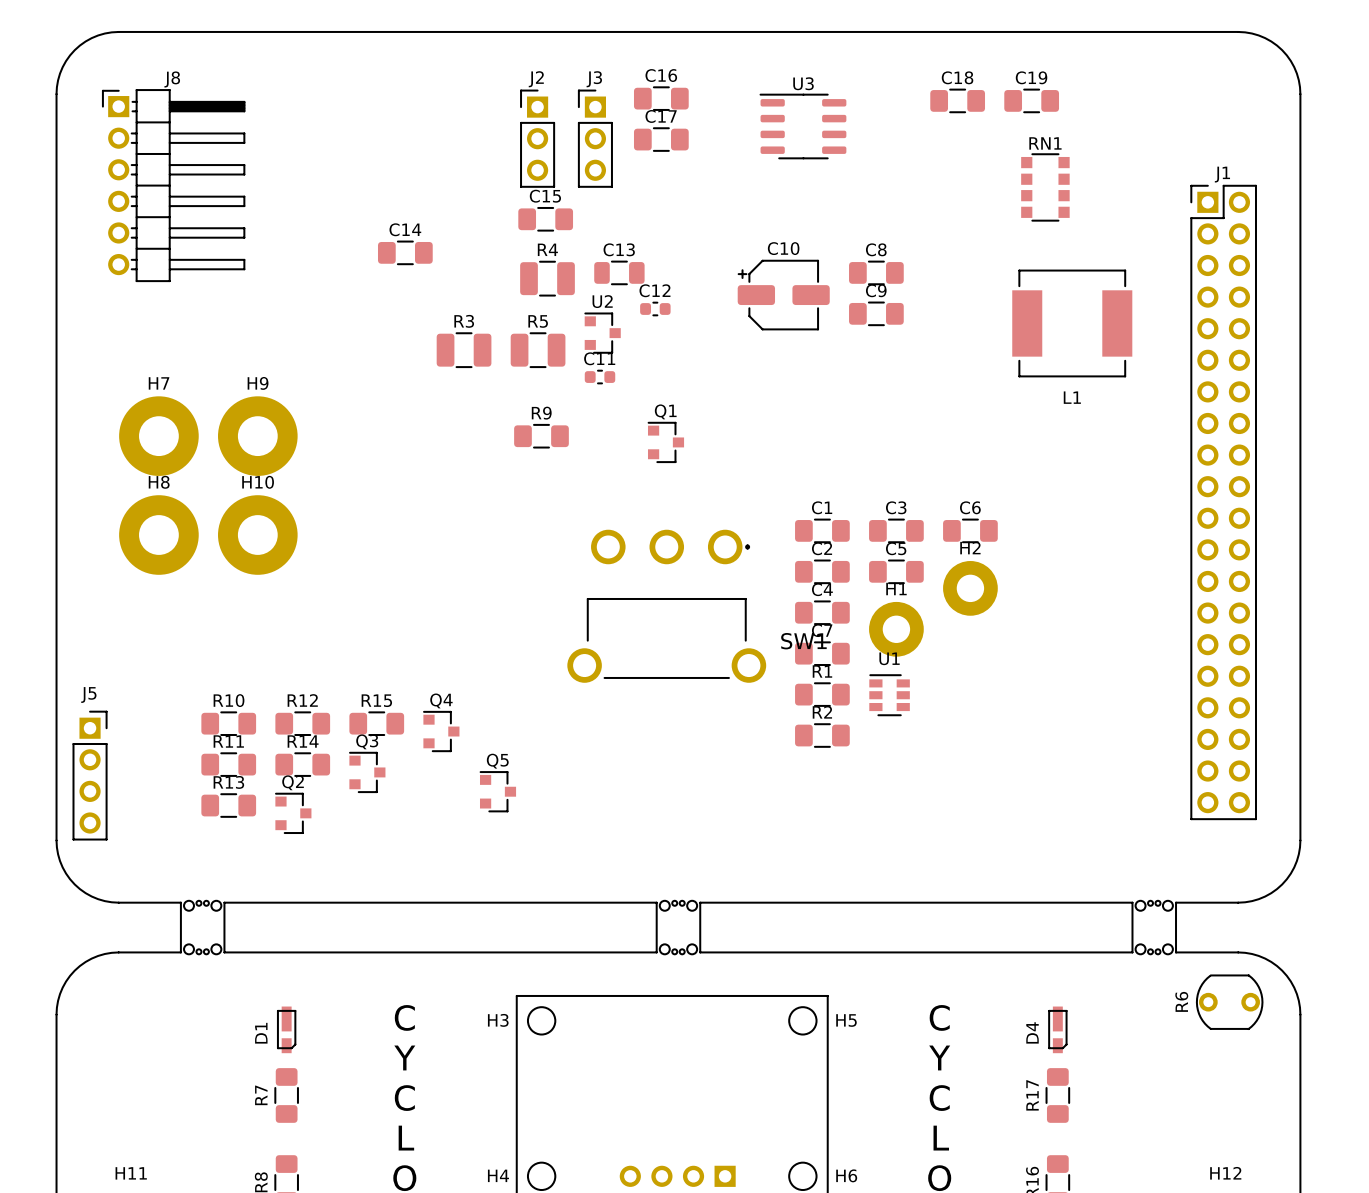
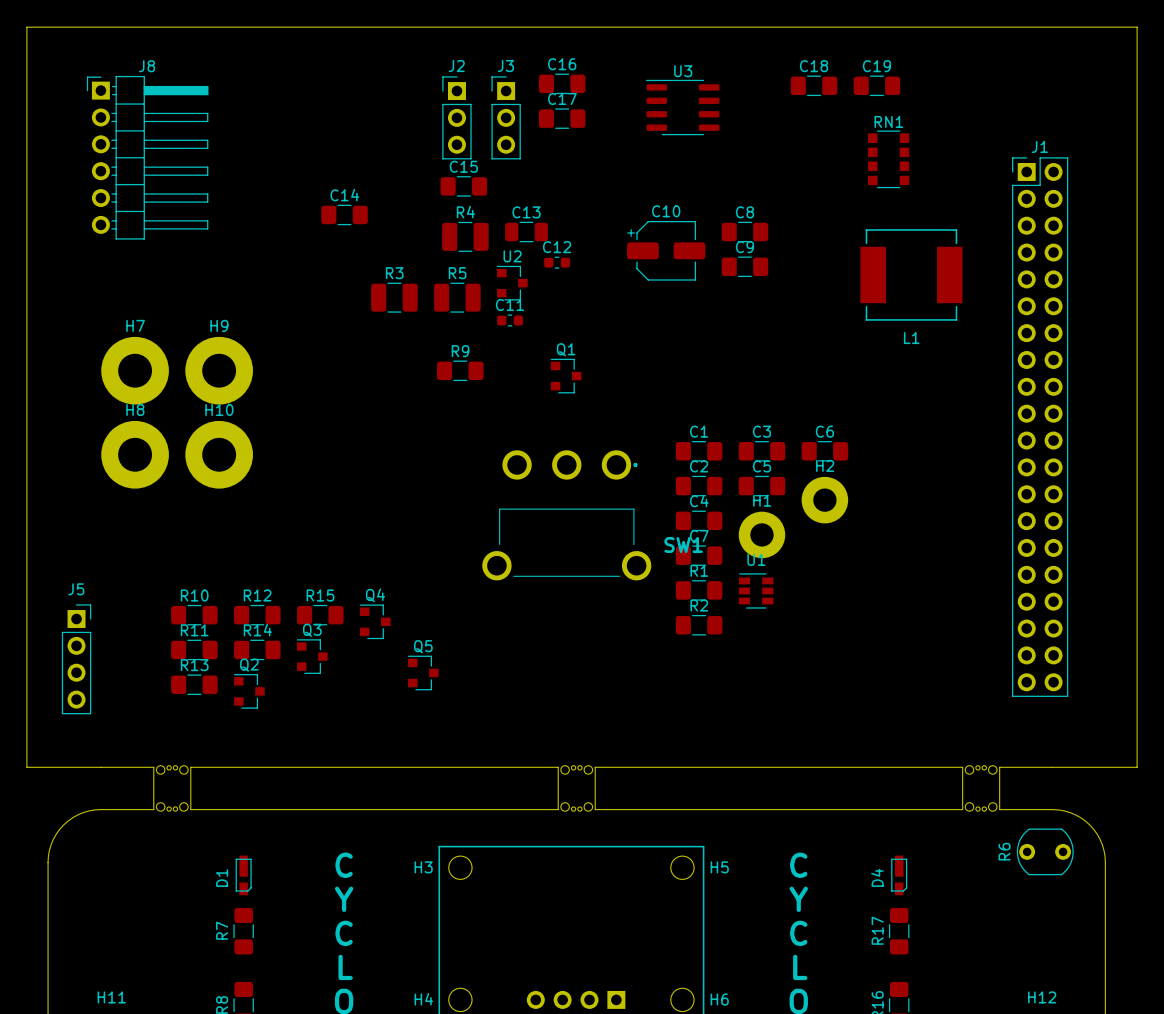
board edge: (118, 31) (104, 33) (91, 38) (74, 50) (62, 67) (58, 80) (56, 94) (56, 847) (62, 867) (74, 884) (85, 893) (98, 899) (118, 902) -> (100, 27) (26, 27) (26, 767) (100, 767)
board edge: (1238, 31) (1258, 35) (1271, 41) (1282, 50) (1290, 61) (1296, 73) (1300, 94) (1300, 847) (1294, 867) (1282, 884) (1271, 893) (1258, 899) (1238, 902) -> (1052, 27) (1137, 27) (1137, 767) (1052, 767)

